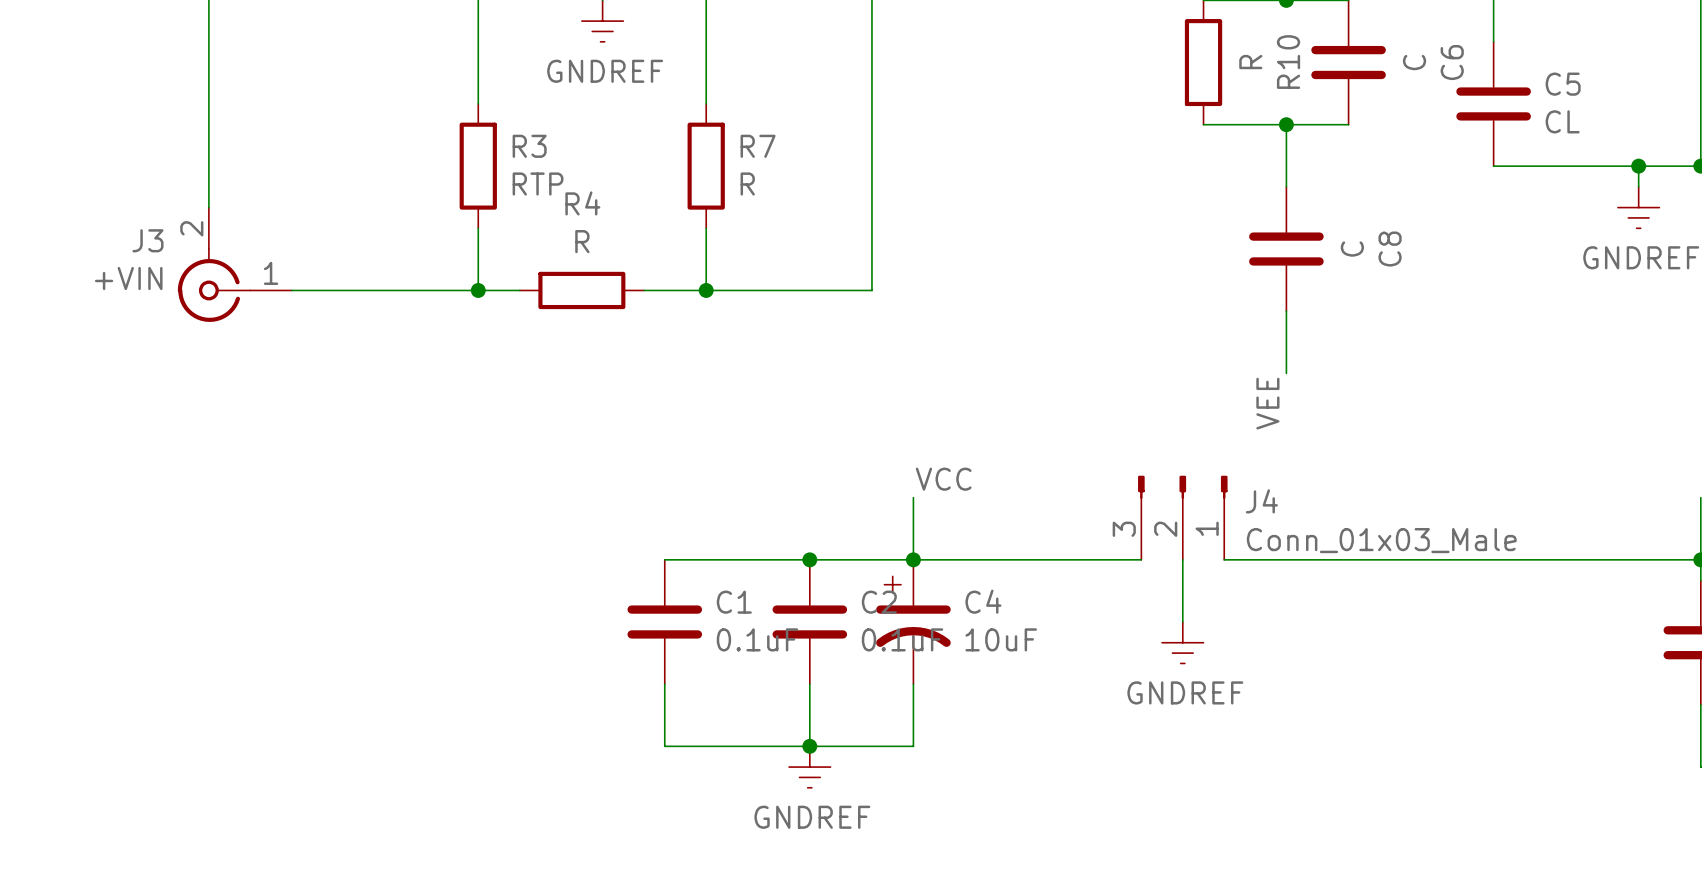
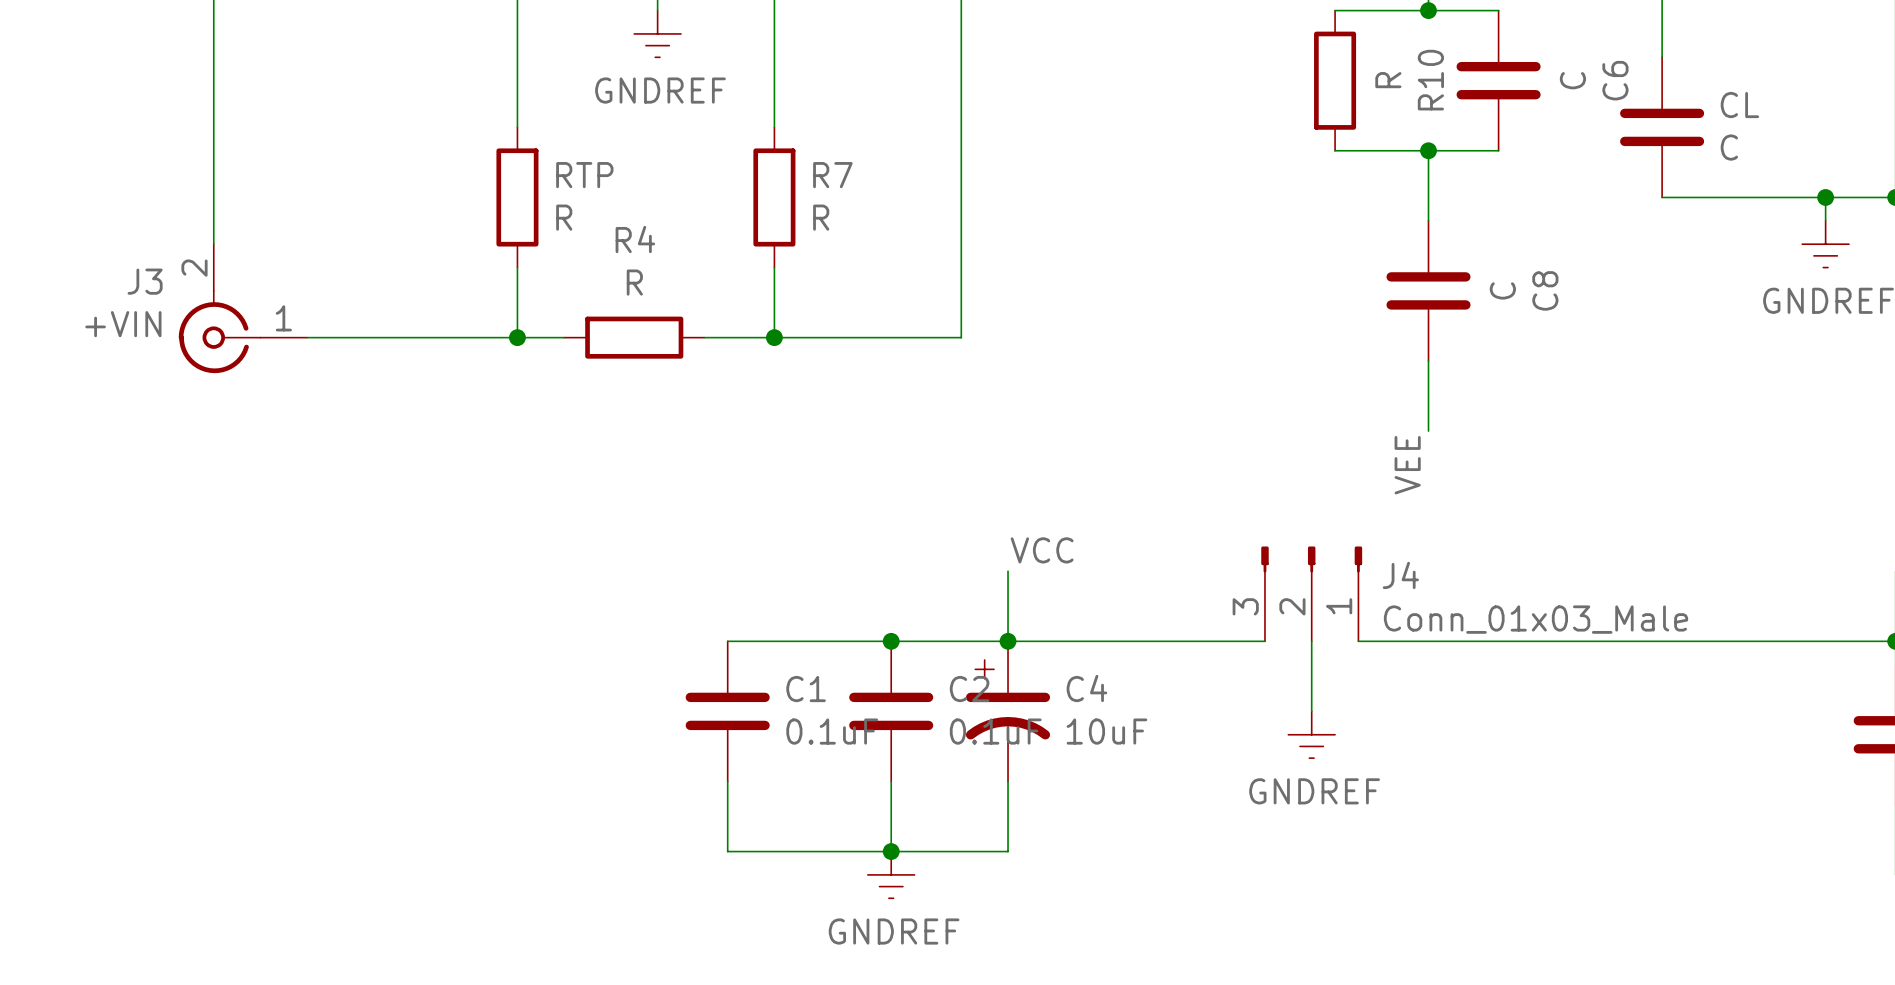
C5 name: C5 (1563, 84) -> CL (1739, 105)
C5 value: CL (1562, 121) -> C (1729, 147)
R3 name: R3 (529, 146) -> RTP (584, 175)
R3 value: RTP (538, 184) -> R (564, 217)

